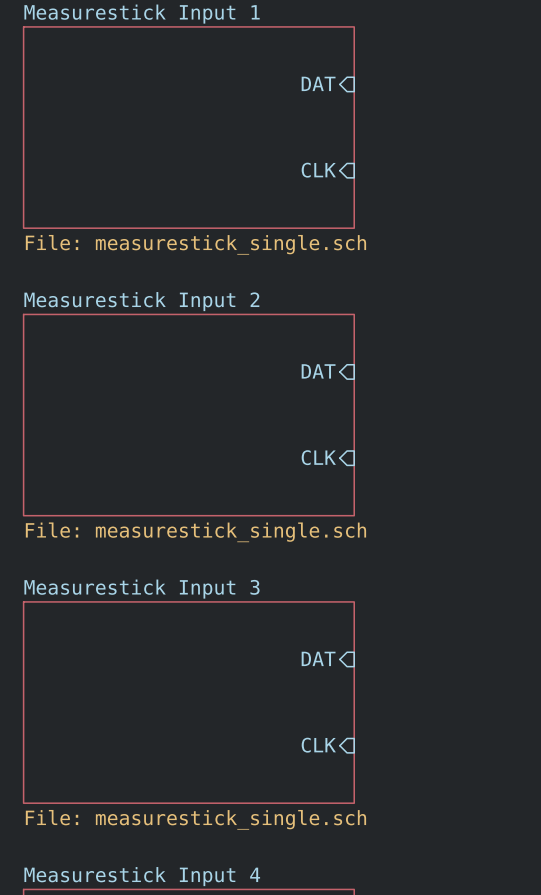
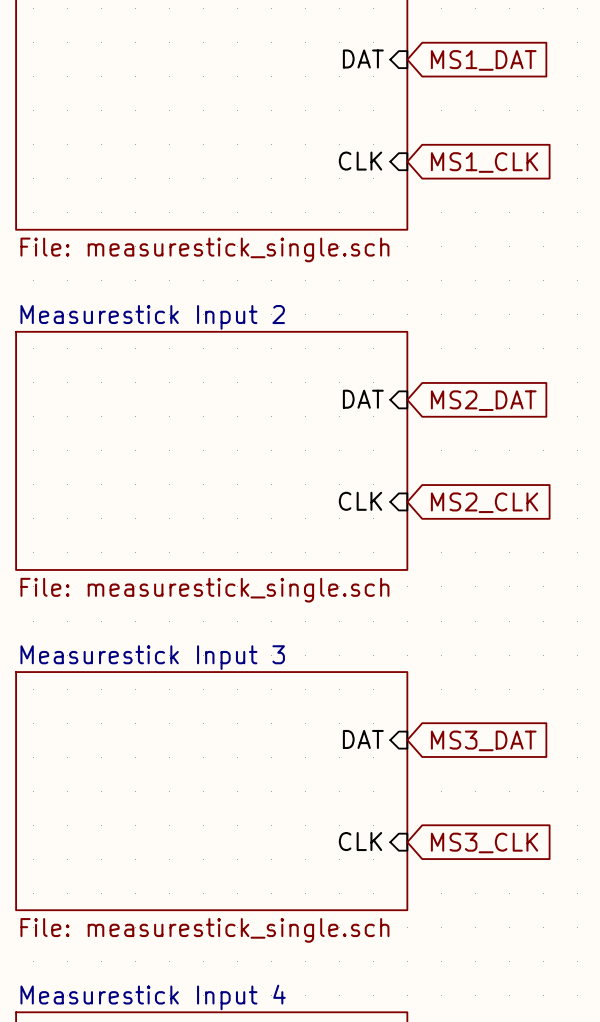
global label: none -> MS1_DAT (483, 60)
global label: none -> MS1_CLK (484, 162)
global label: none -> MS2_DAT (483, 400)
global label: none -> MS2_CLK (484, 502)
global label: none -> MS3_DAT (483, 740)
global label: none -> MS3_CLK (484, 842)

